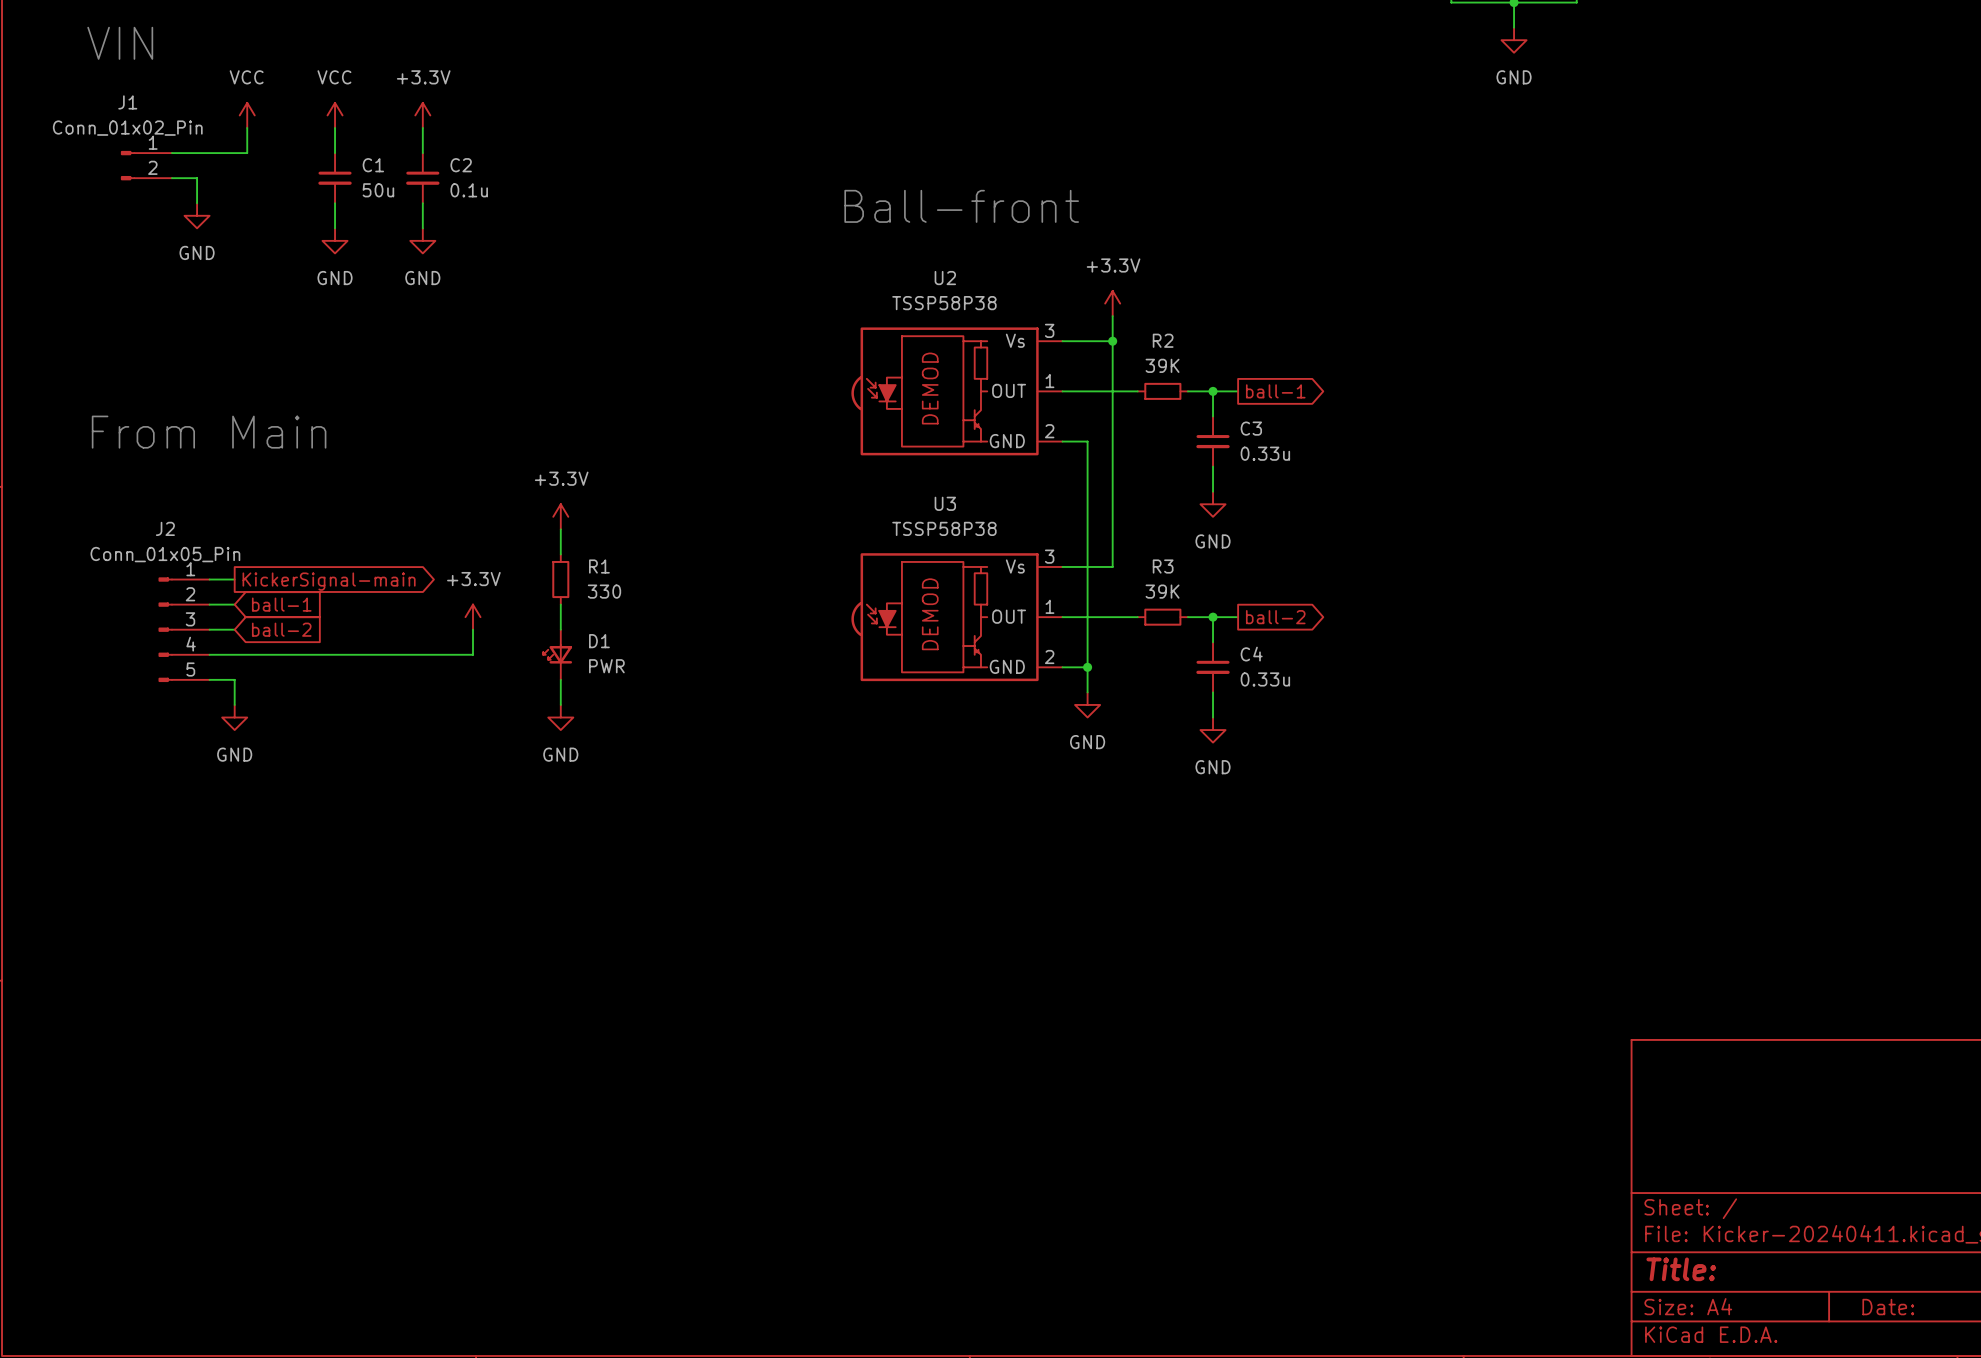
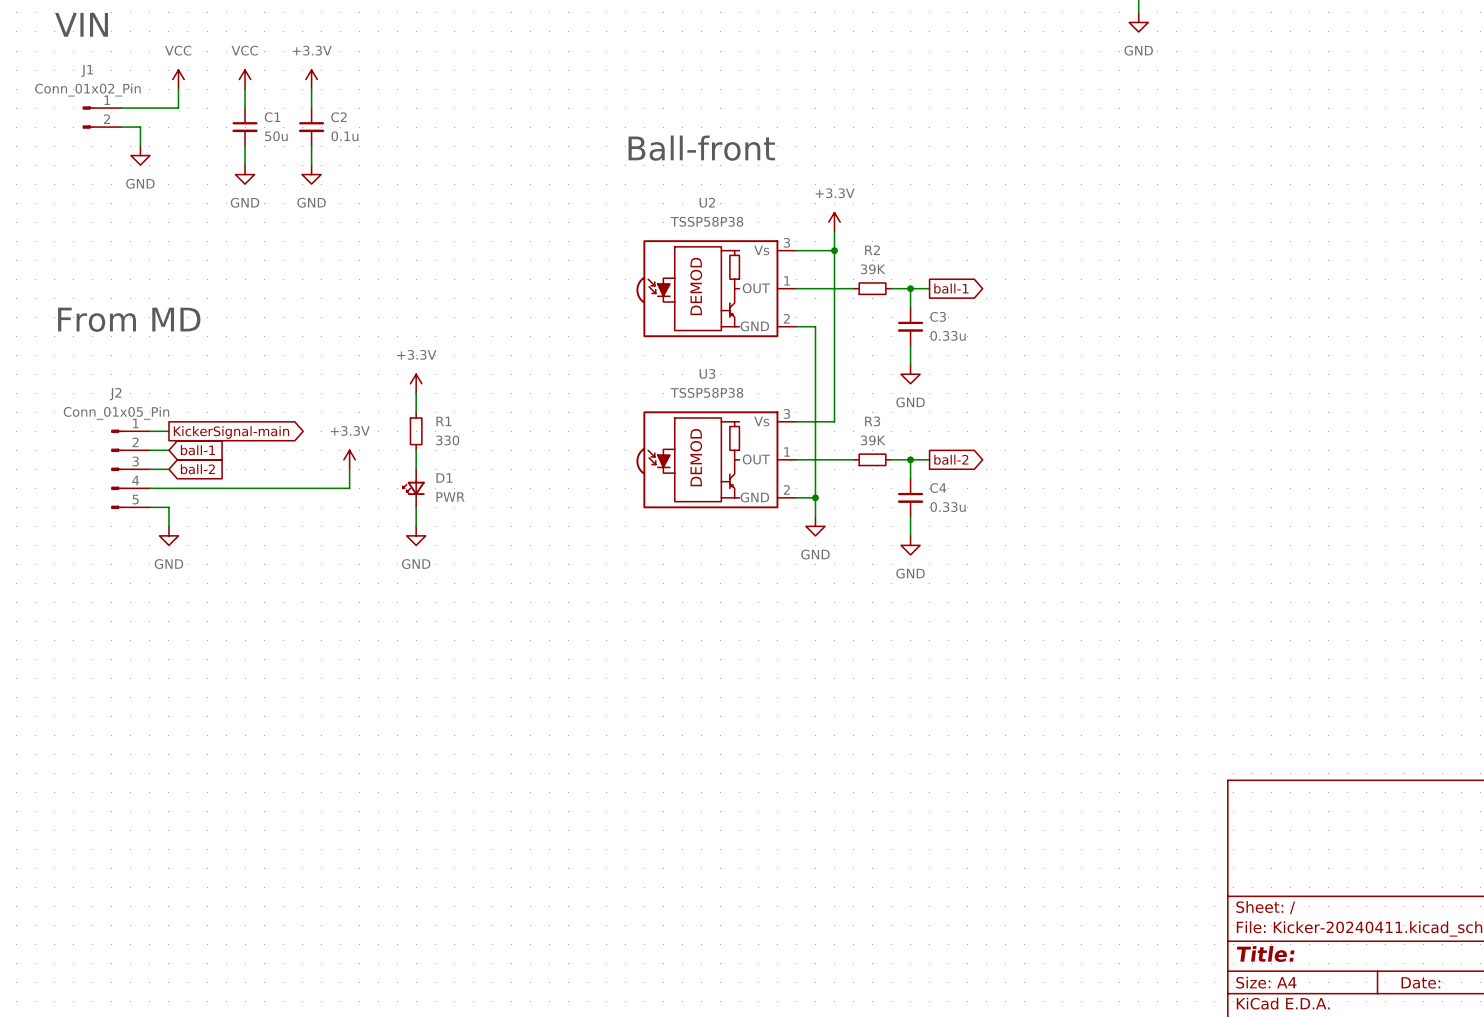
text: From Main (209, 432) -> From MD (129, 319)

